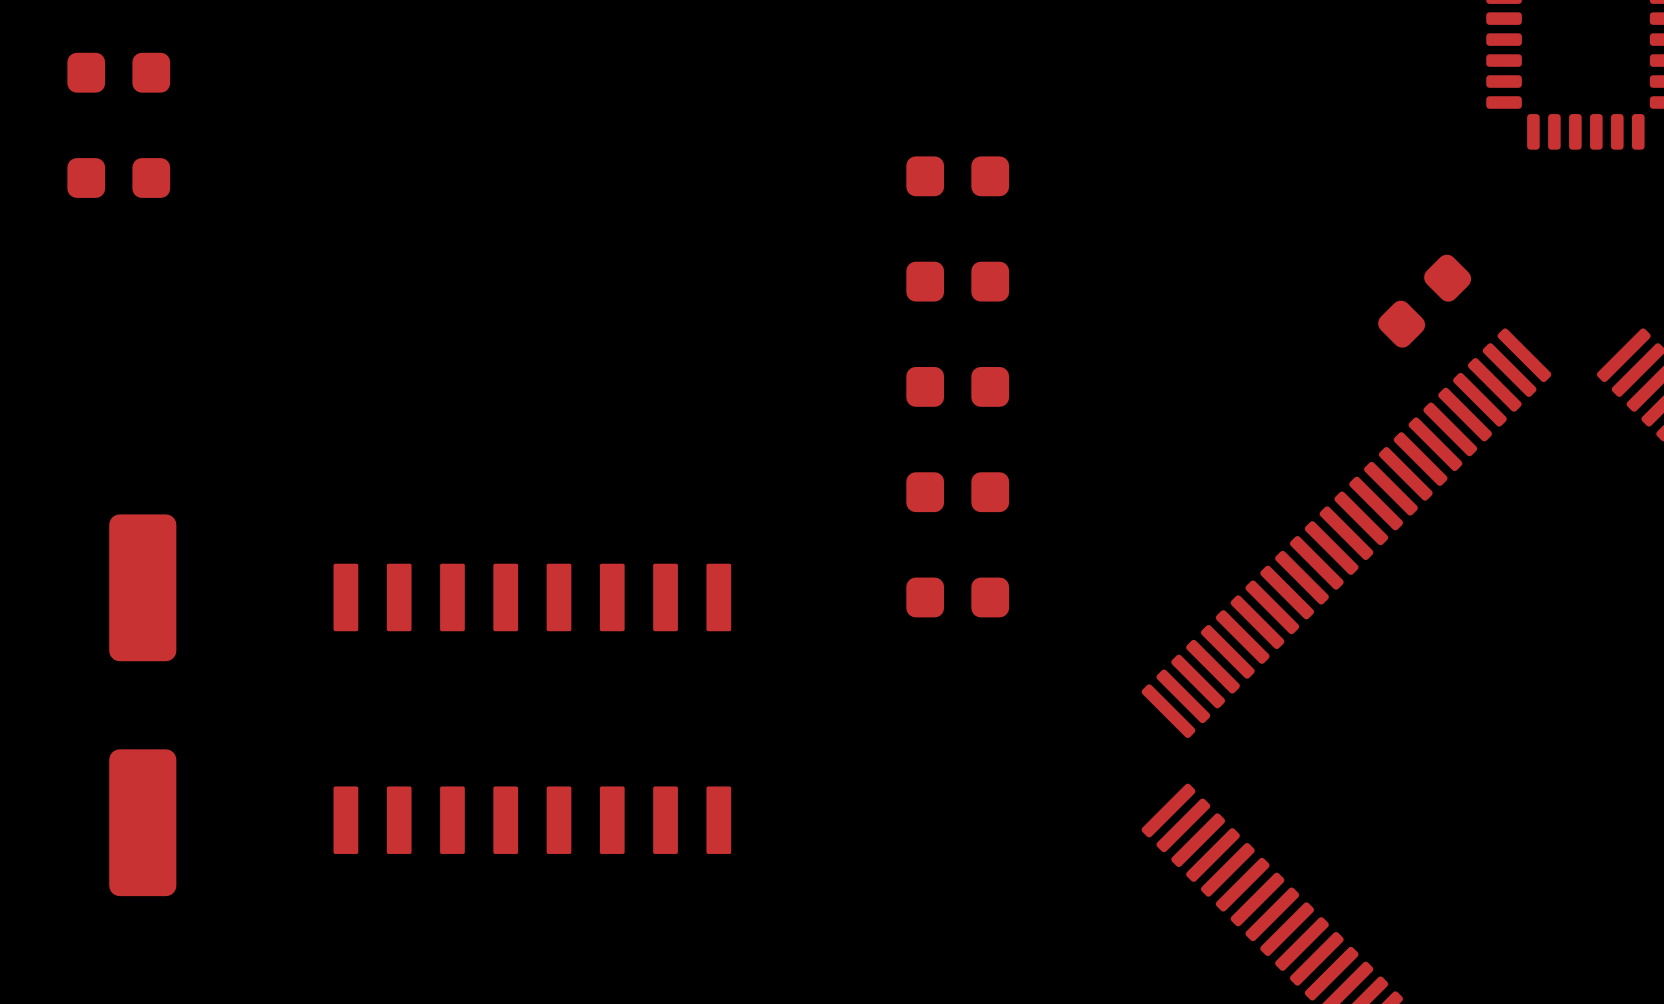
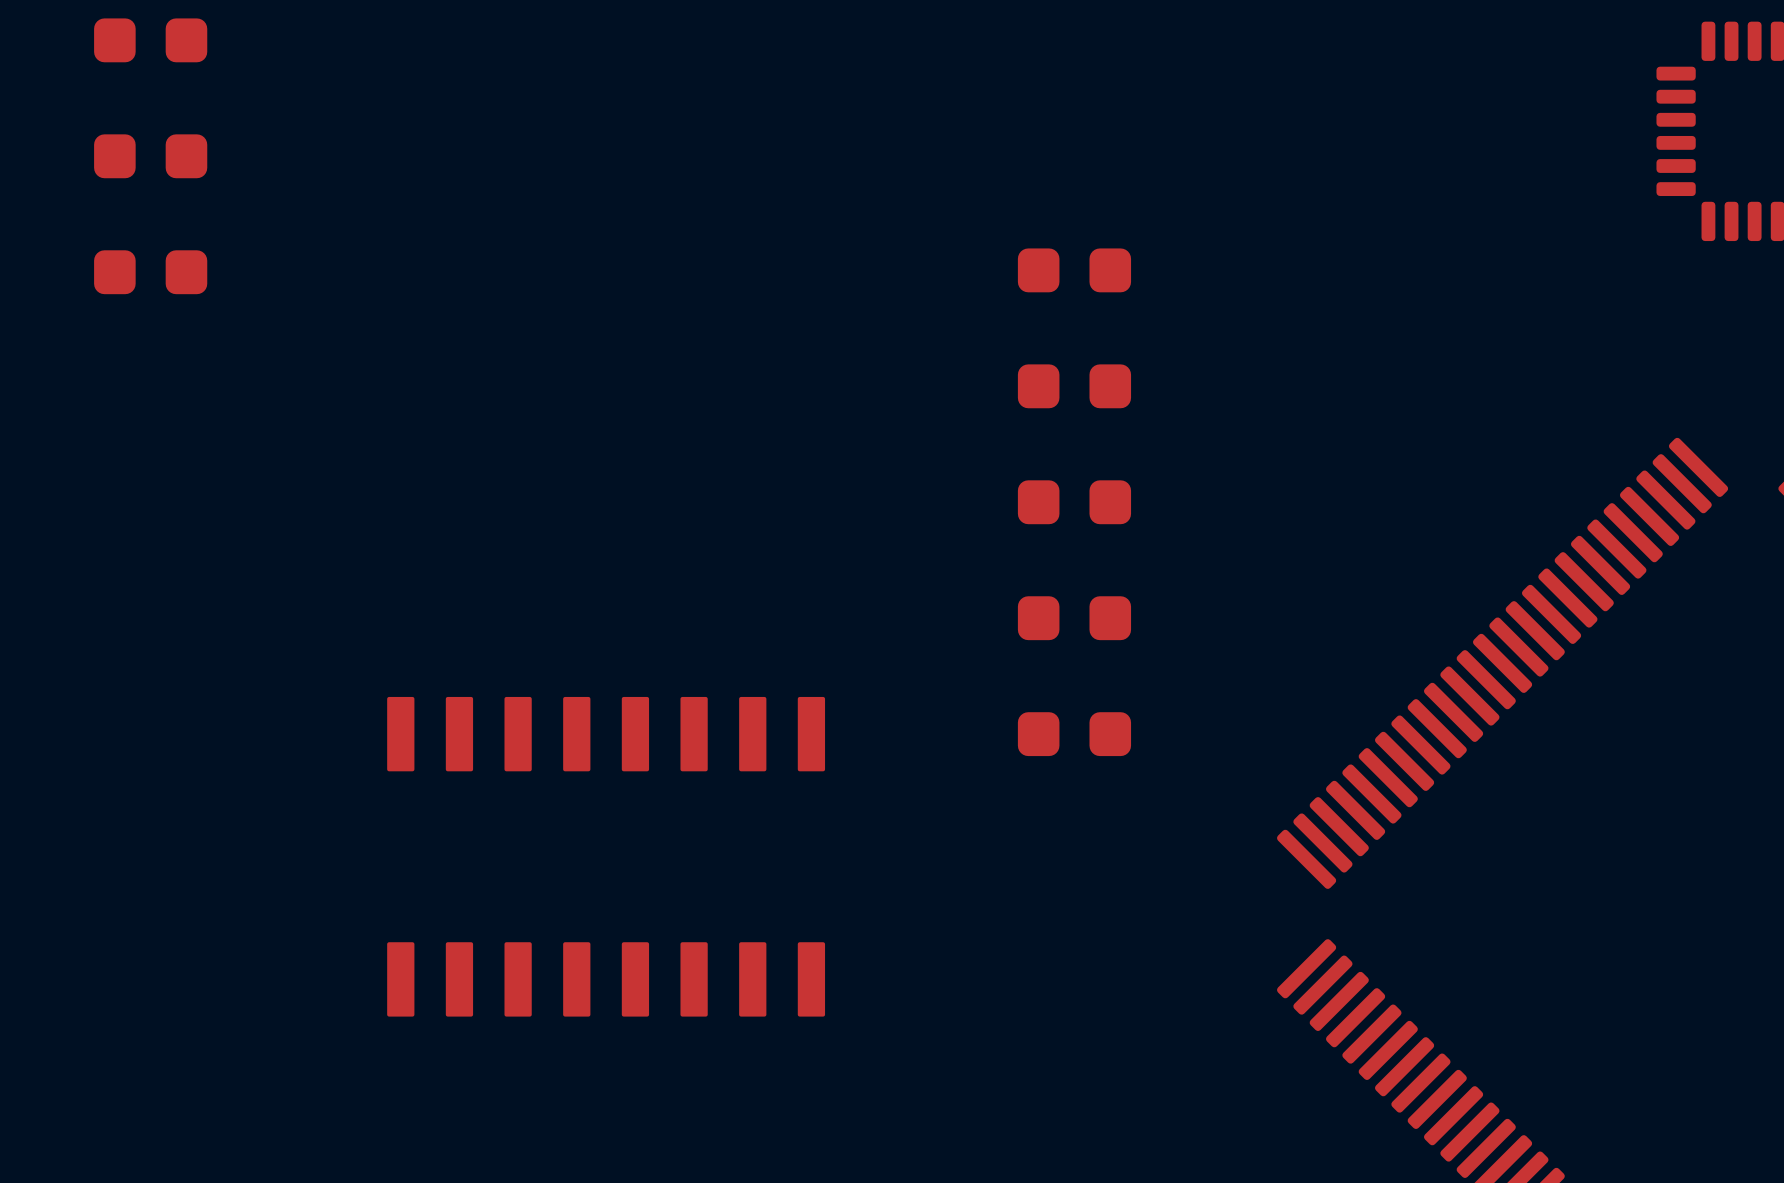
part: (1424, 301) -> none
part: (142, 705) -> none

